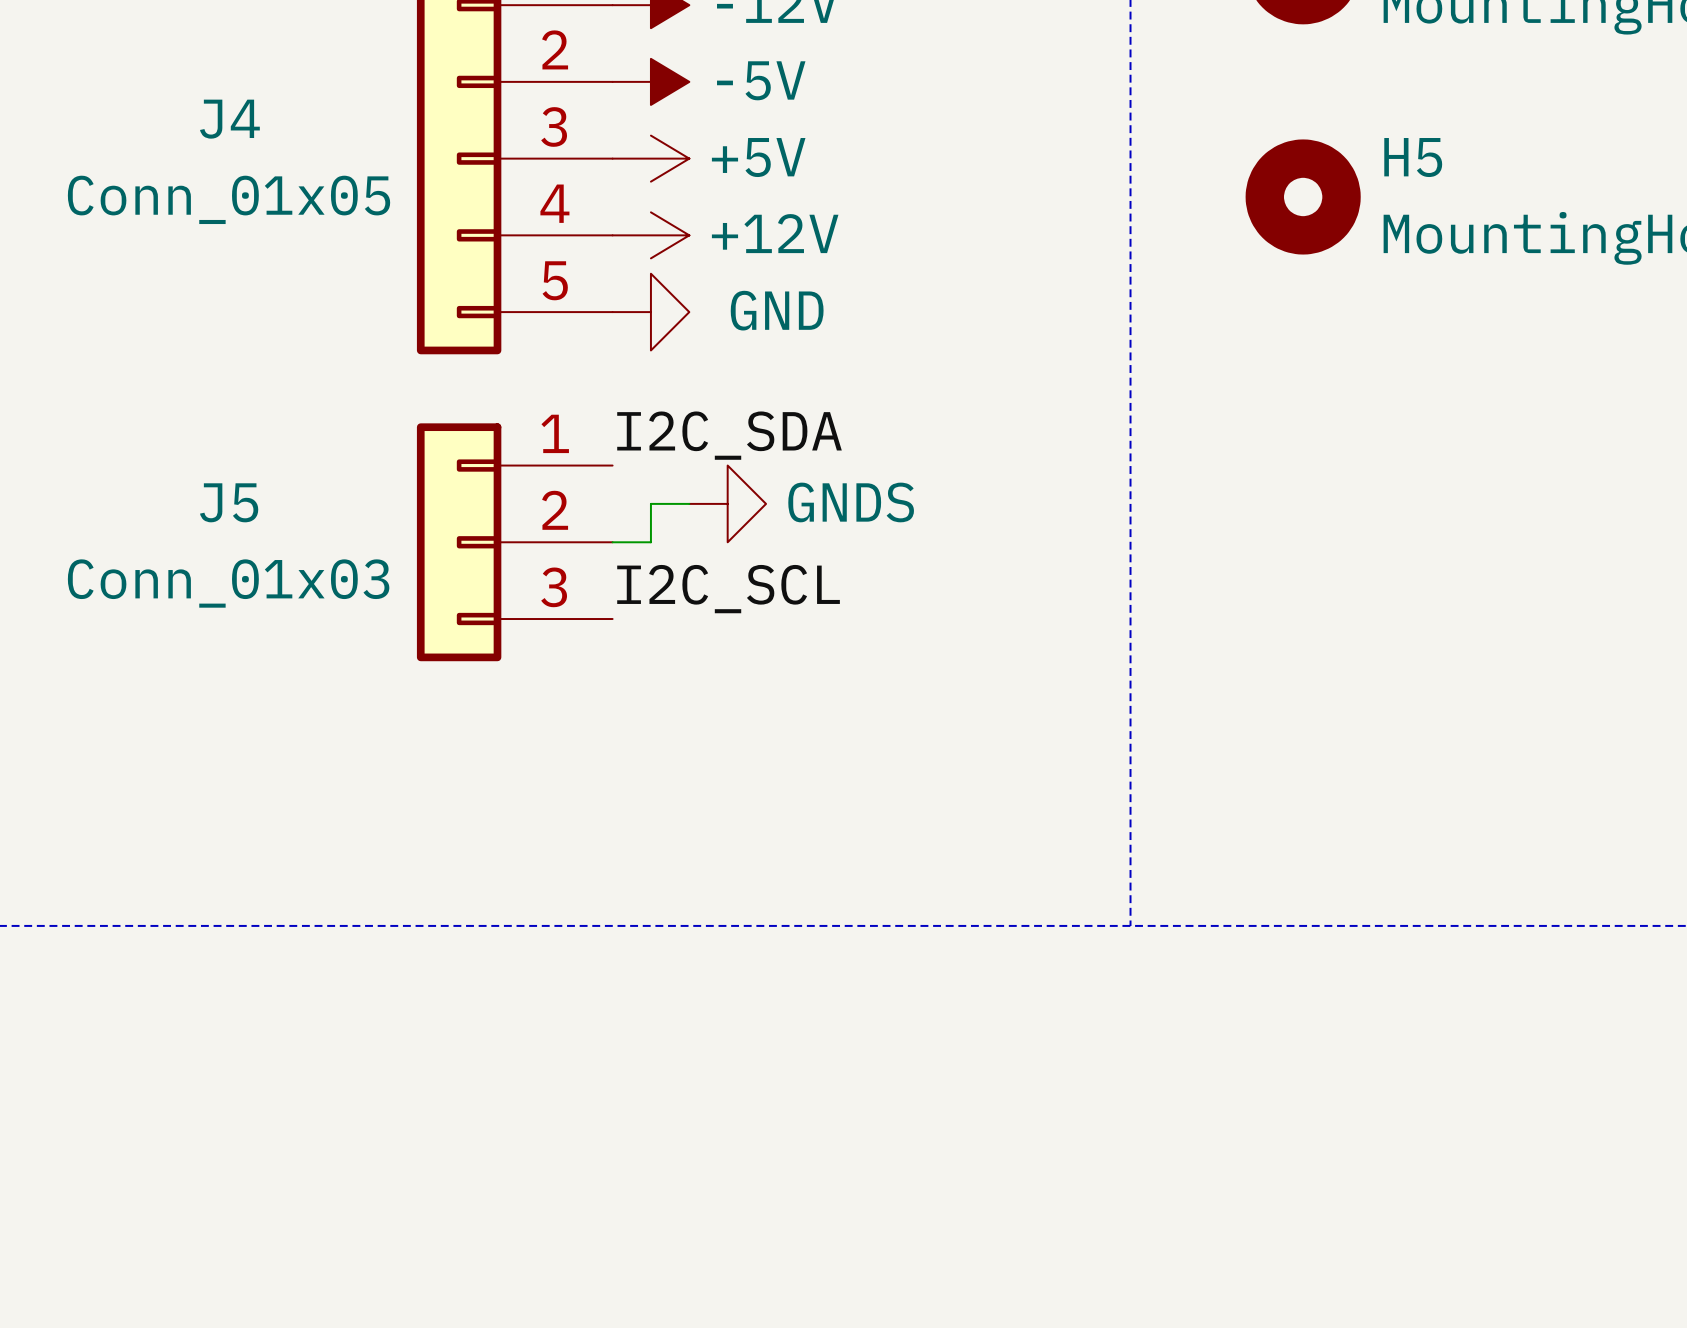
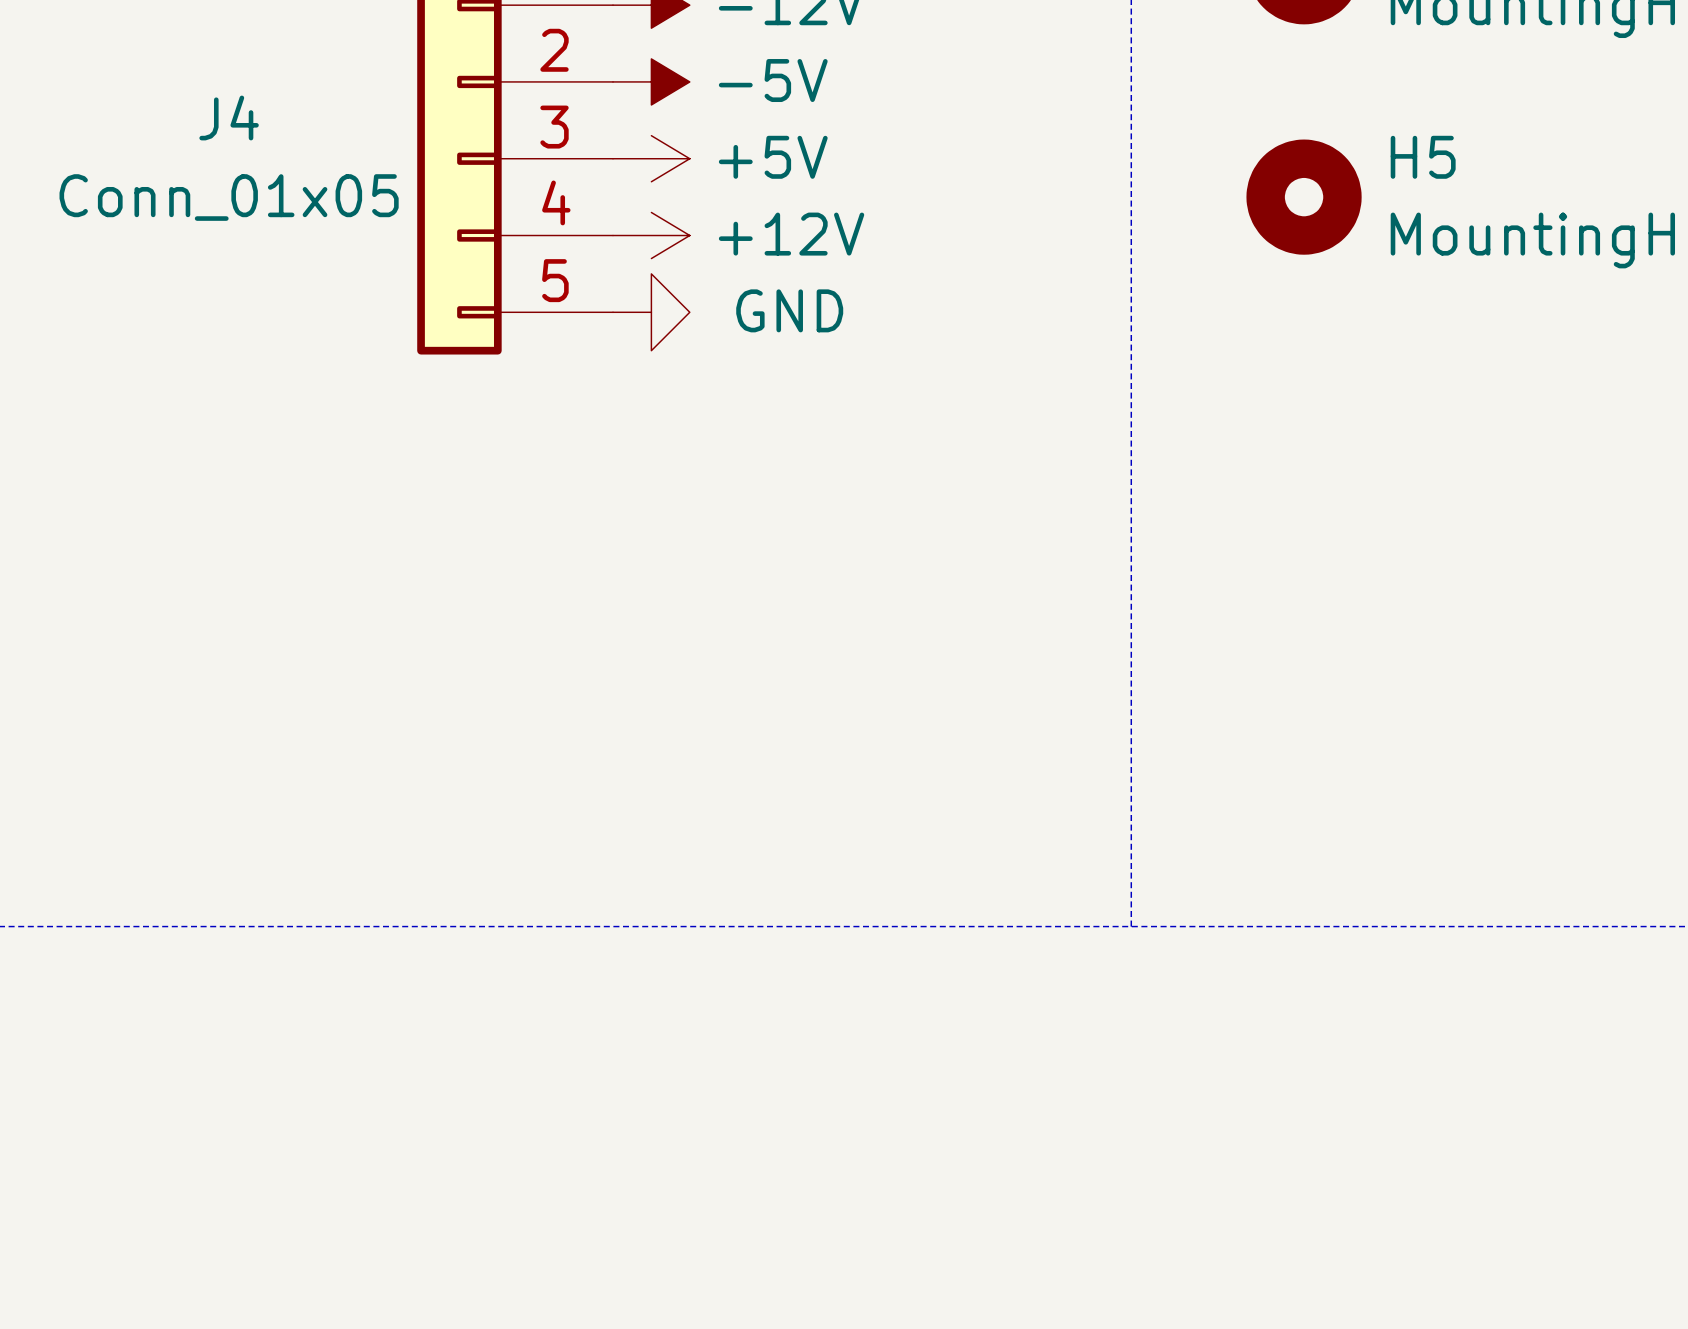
label: I2C_SDA (729, 435) -> none
wire: (689, 503) (650, 503) (650, 542) (612, 542) -> none
power symbol: GNDS (727, 503) -> none
J5: Conn_01x03 (514, 542) -> none
label: I2C_SCL (728, 589) -> none

